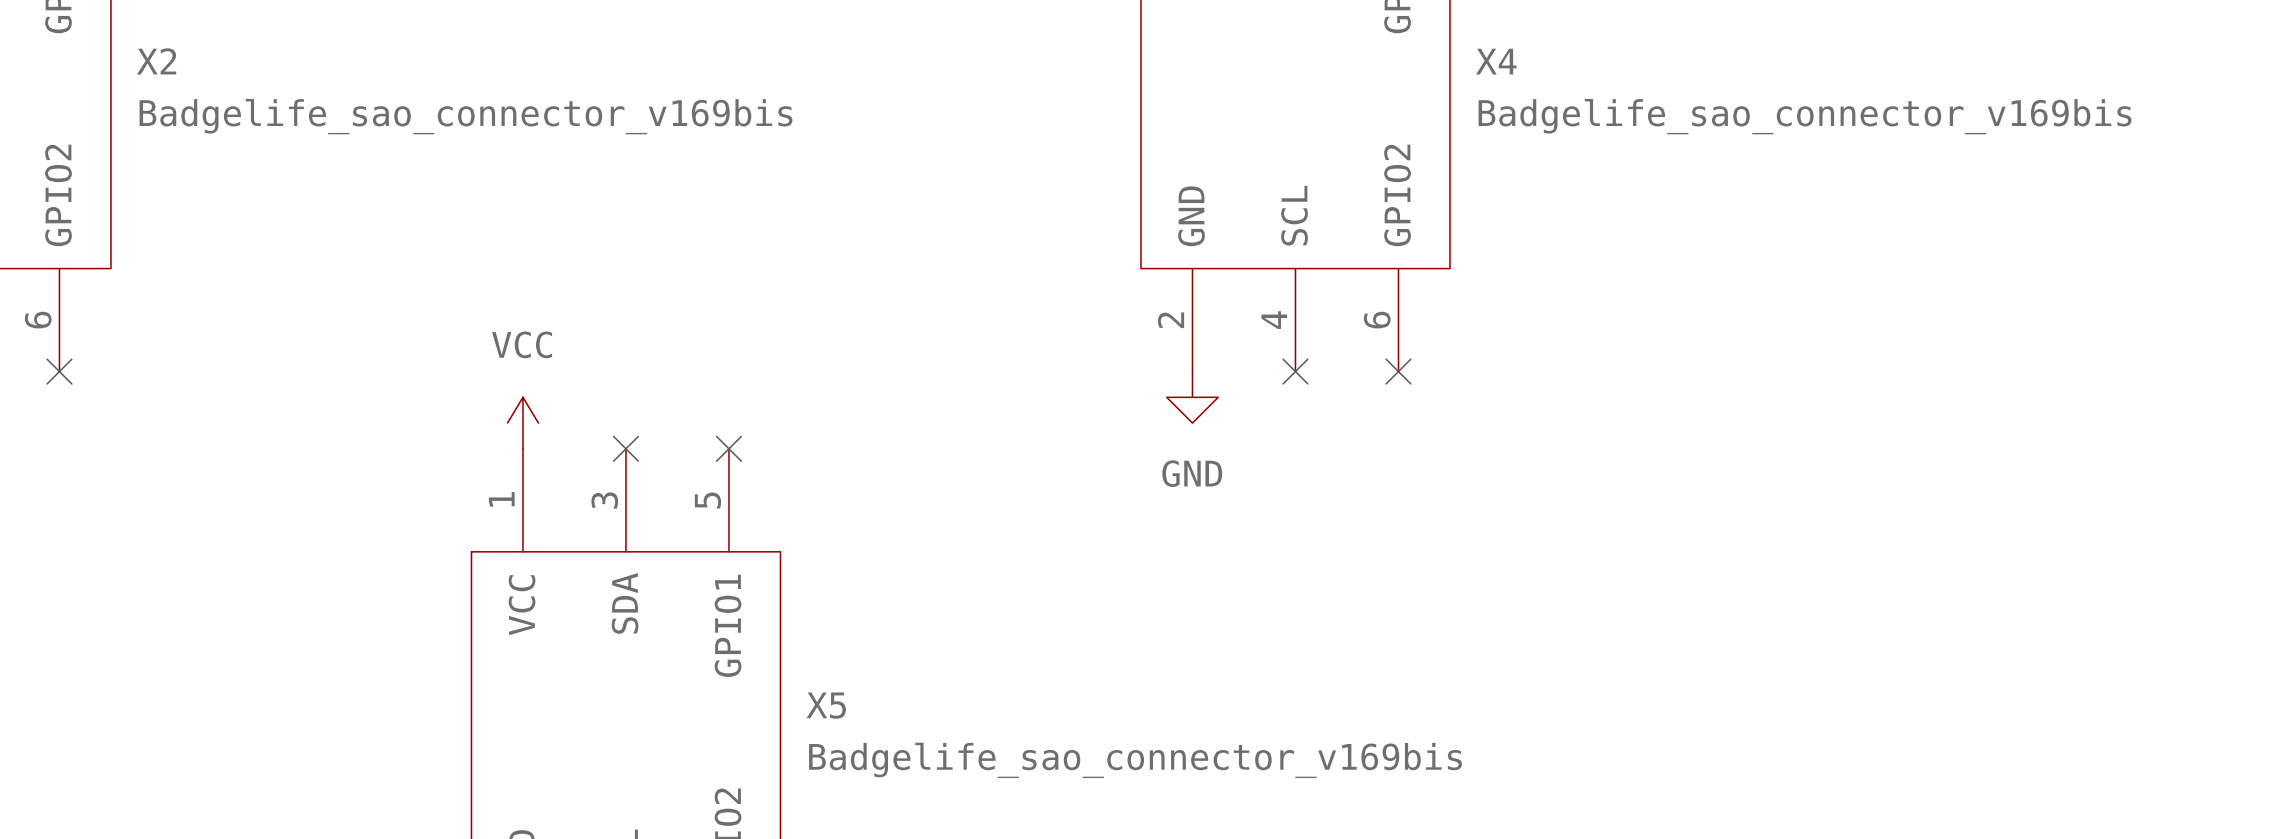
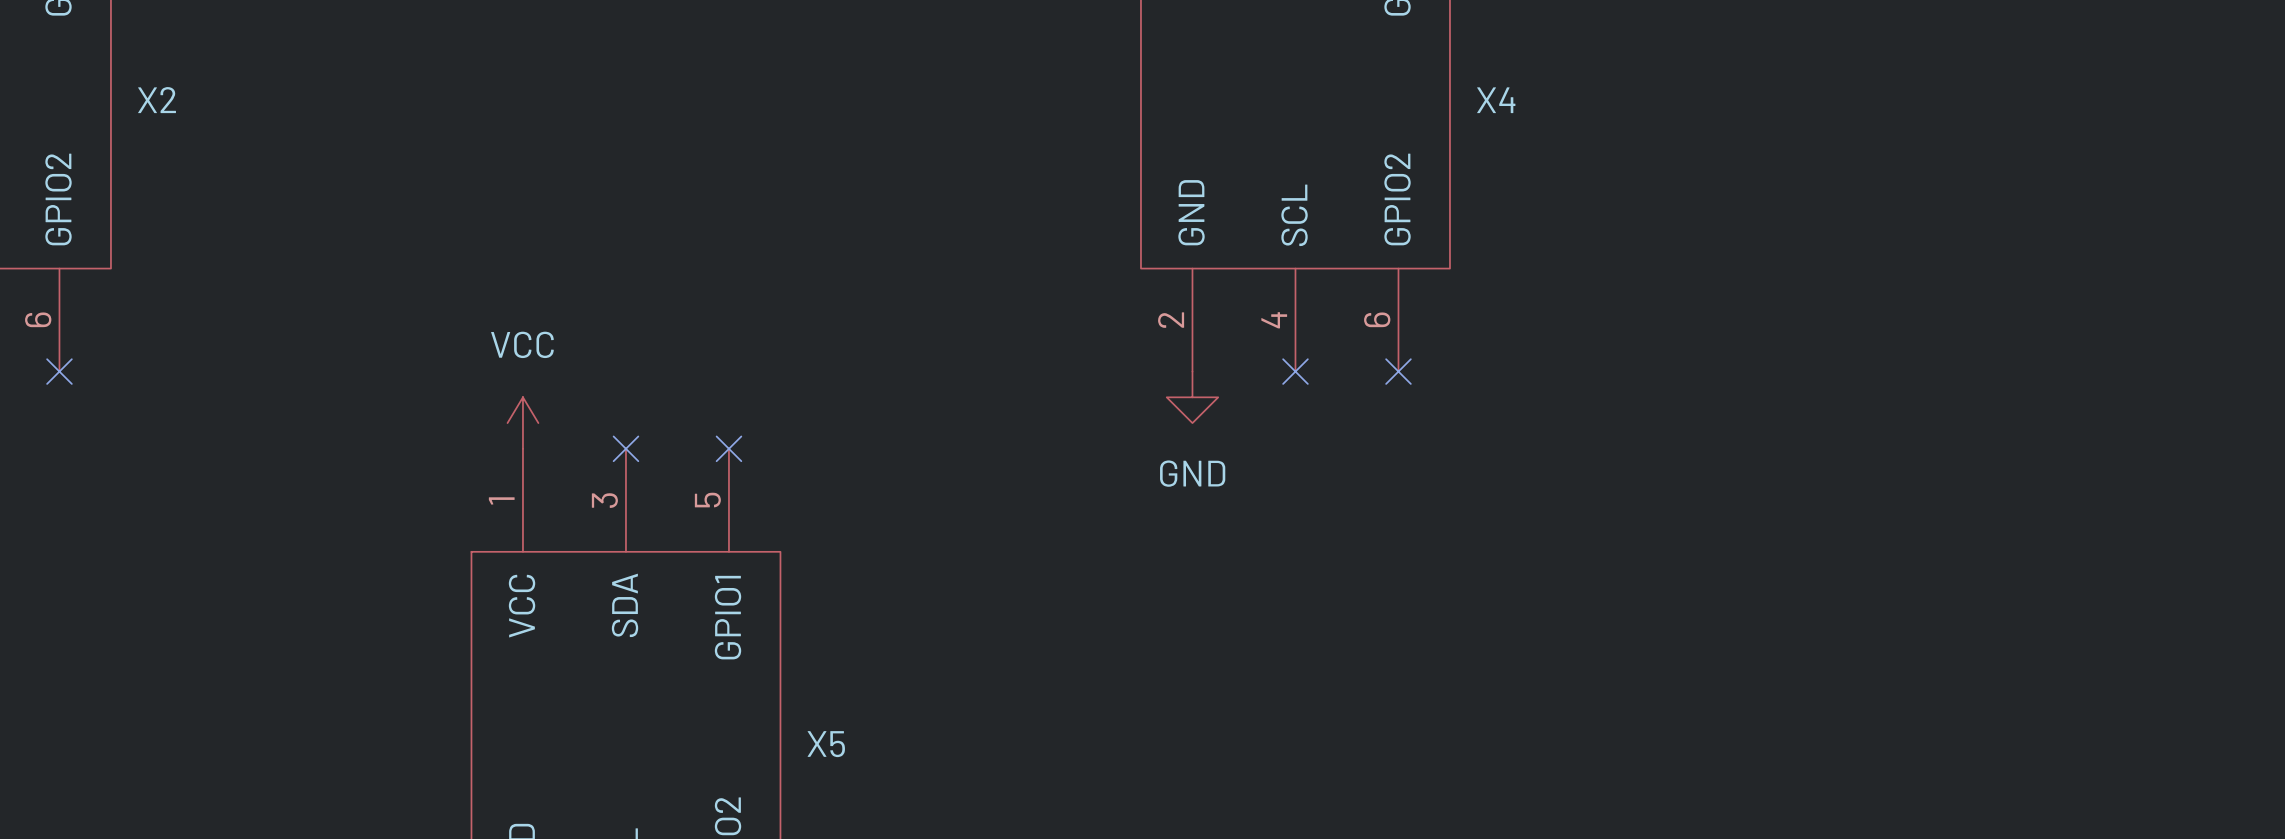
X2 name position: X2 (156, 61) -> X2 (157, 100)
X4 name position: X4 (1496, 61) -> X4 (1496, 100)
X2 value: Badgelife_sao_connector_v169bis (465, 116) -> none
X4 value: Badgelife_sao_connector_v169bis (1805, 116) -> none
X5 name position: X5 (826, 705) -> X5 (826, 744)
X5 value: Badgelife_sao_connector_v169bis (1135, 760) -> none

